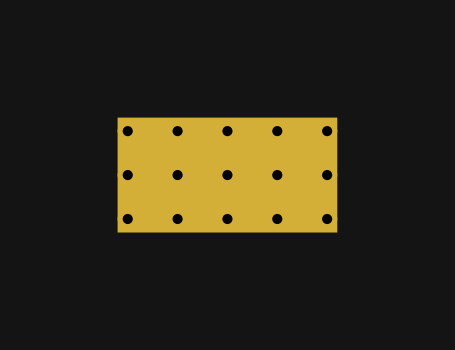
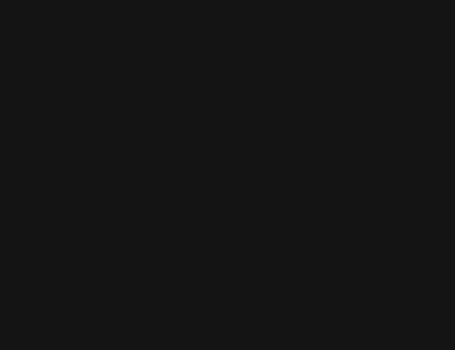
part: (227, 175) -> none

